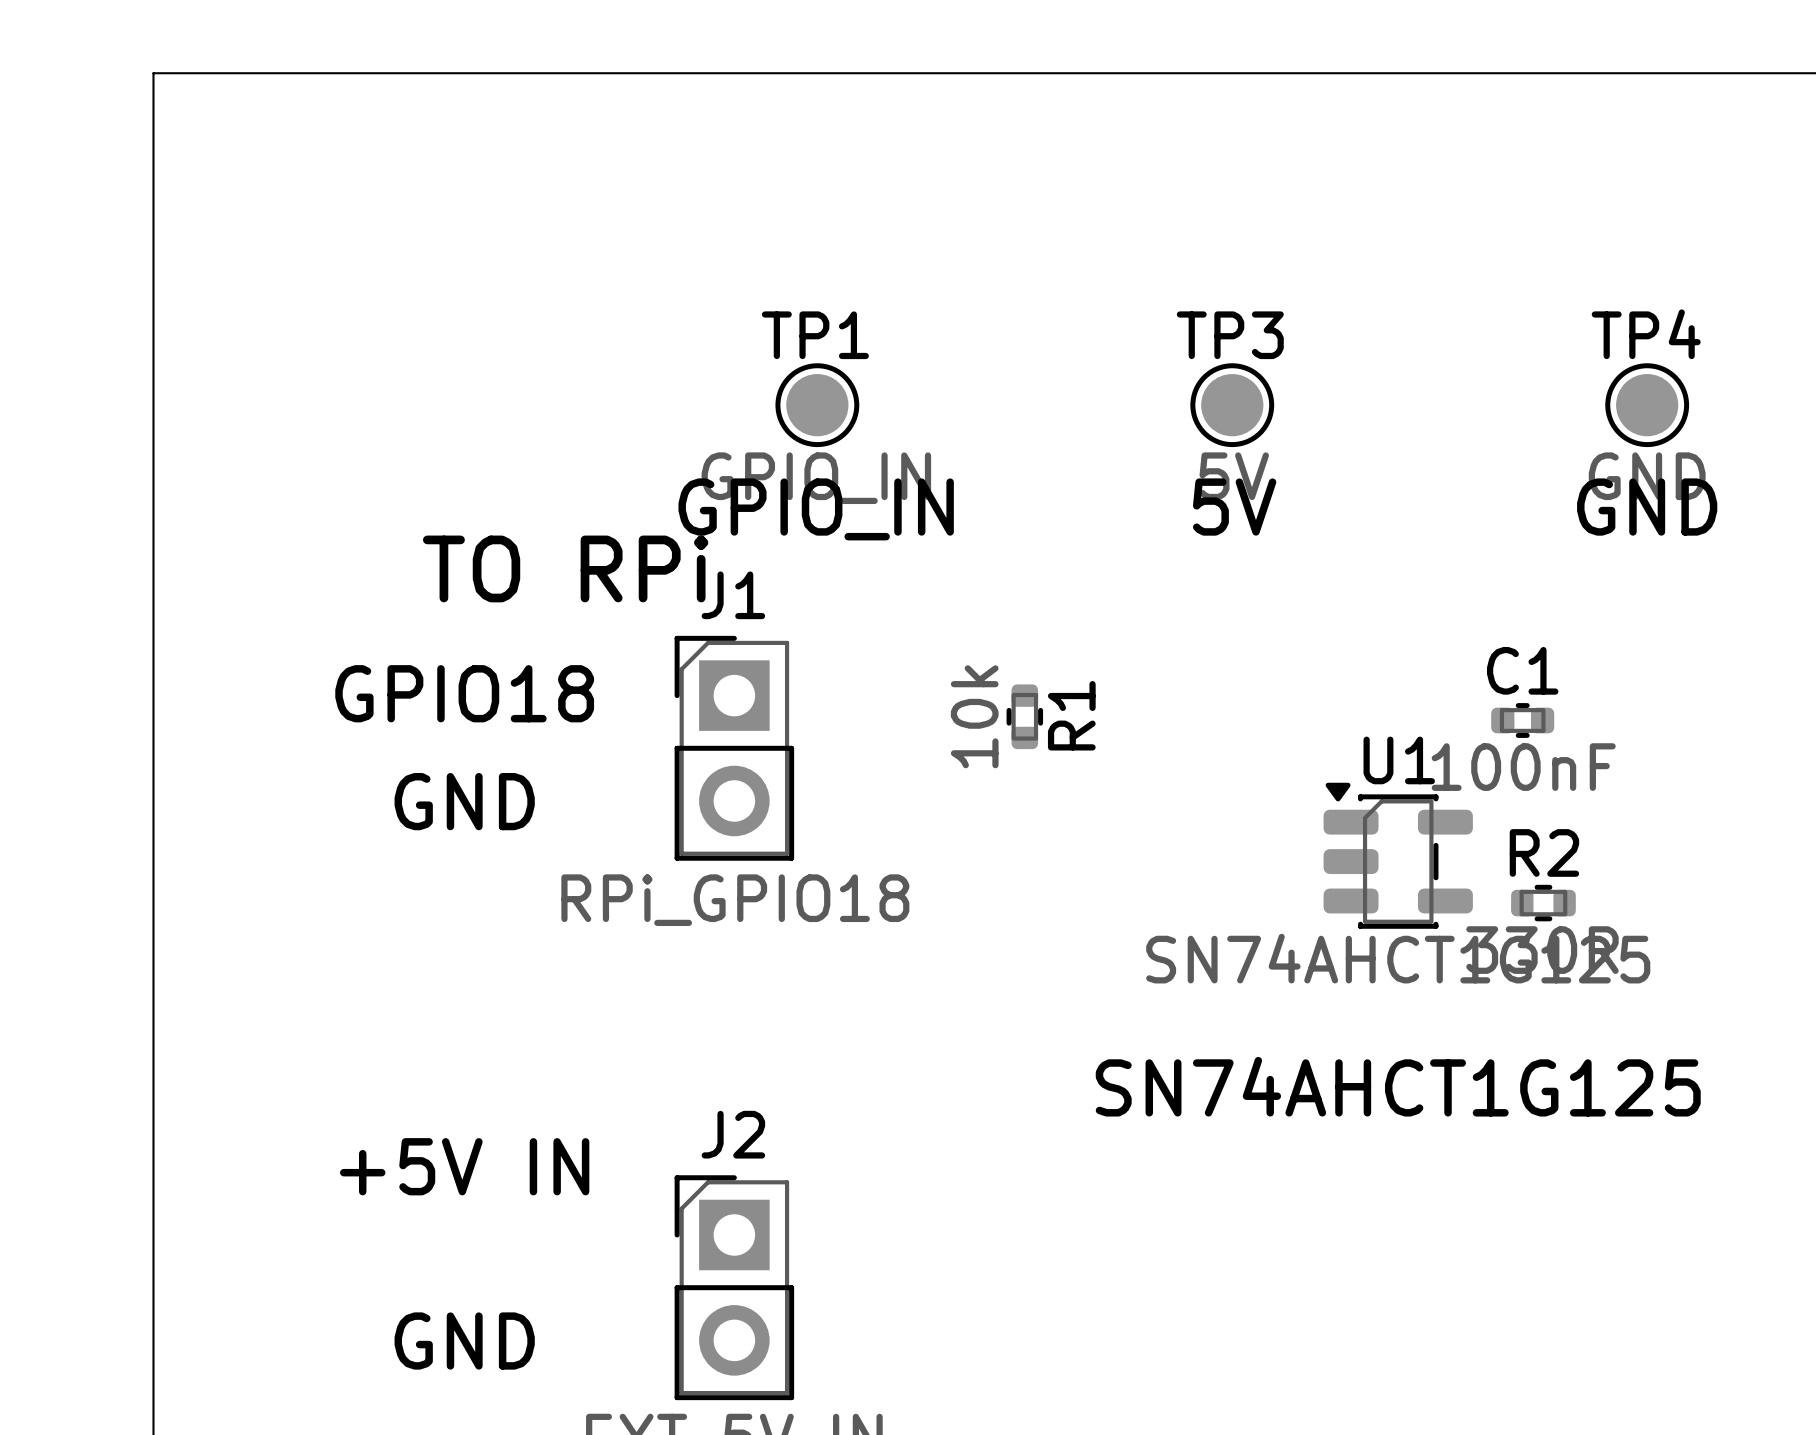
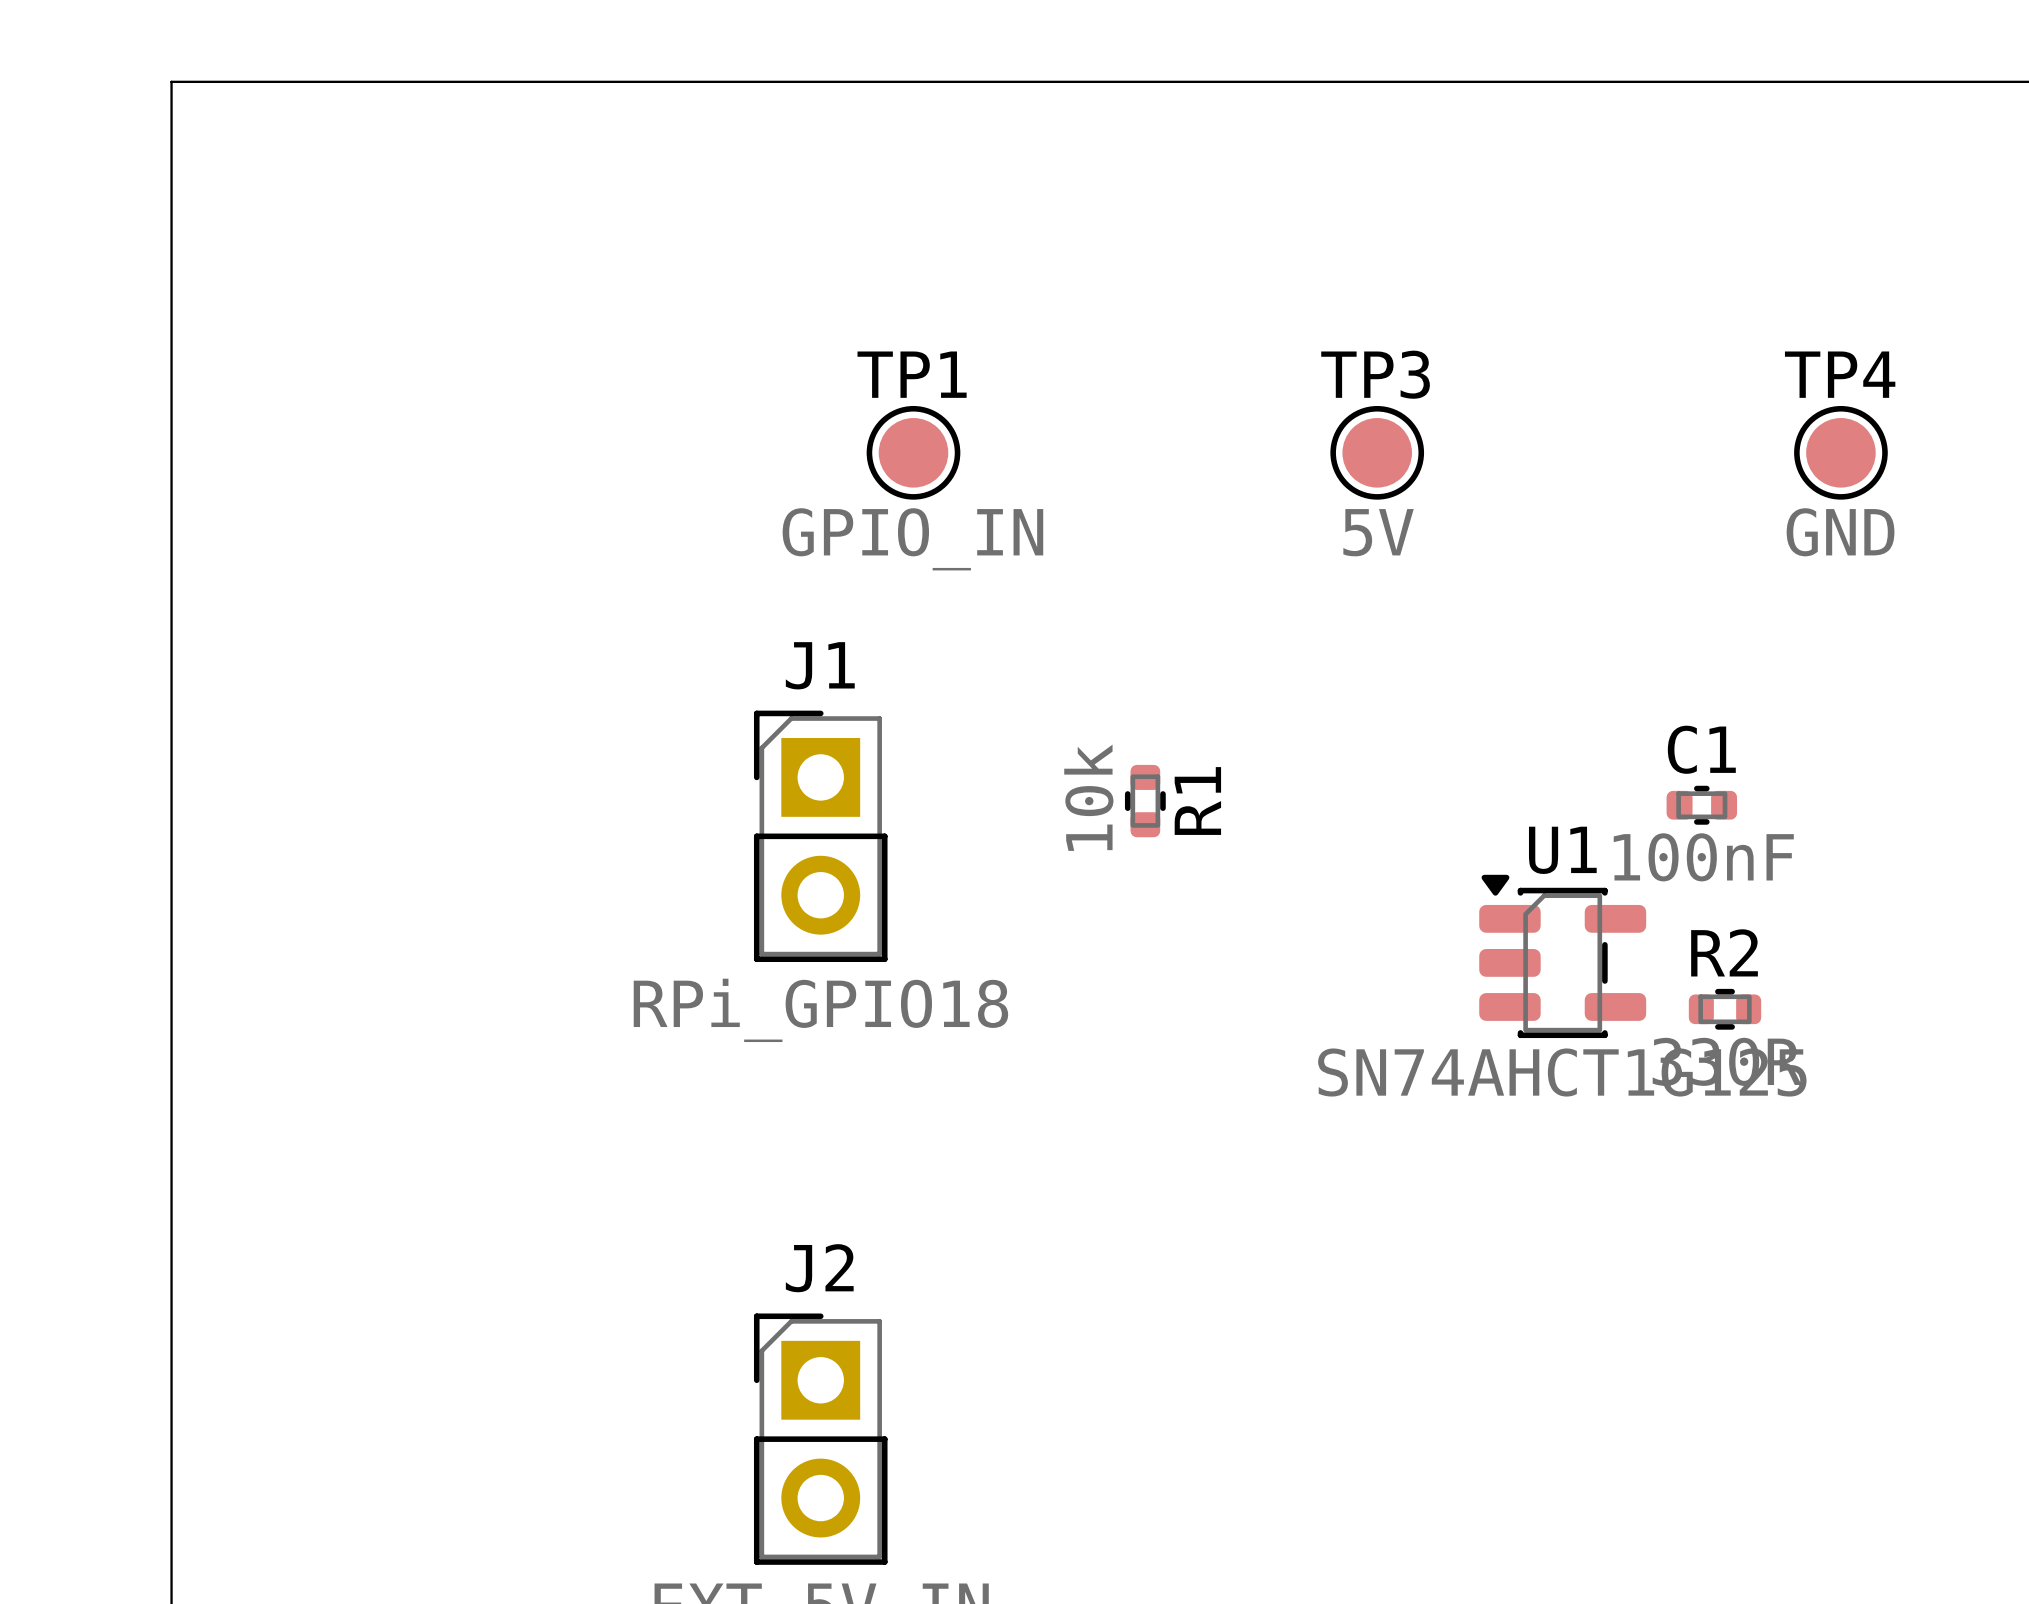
text: 5V (1234, 507) -> none
text: GND (1647, 507) -> none
text: GPIO_IN (816, 509) -> none
text: TO RPi (565, 568) -> none
text: GPIO18 (464, 693) -> none
text: GND (464, 801) -> none
text: SN74AHCT1G125 (1398, 1086) -> none
text: +5V IN (464, 1166) -> none
text: GND (464, 1341) -> none

